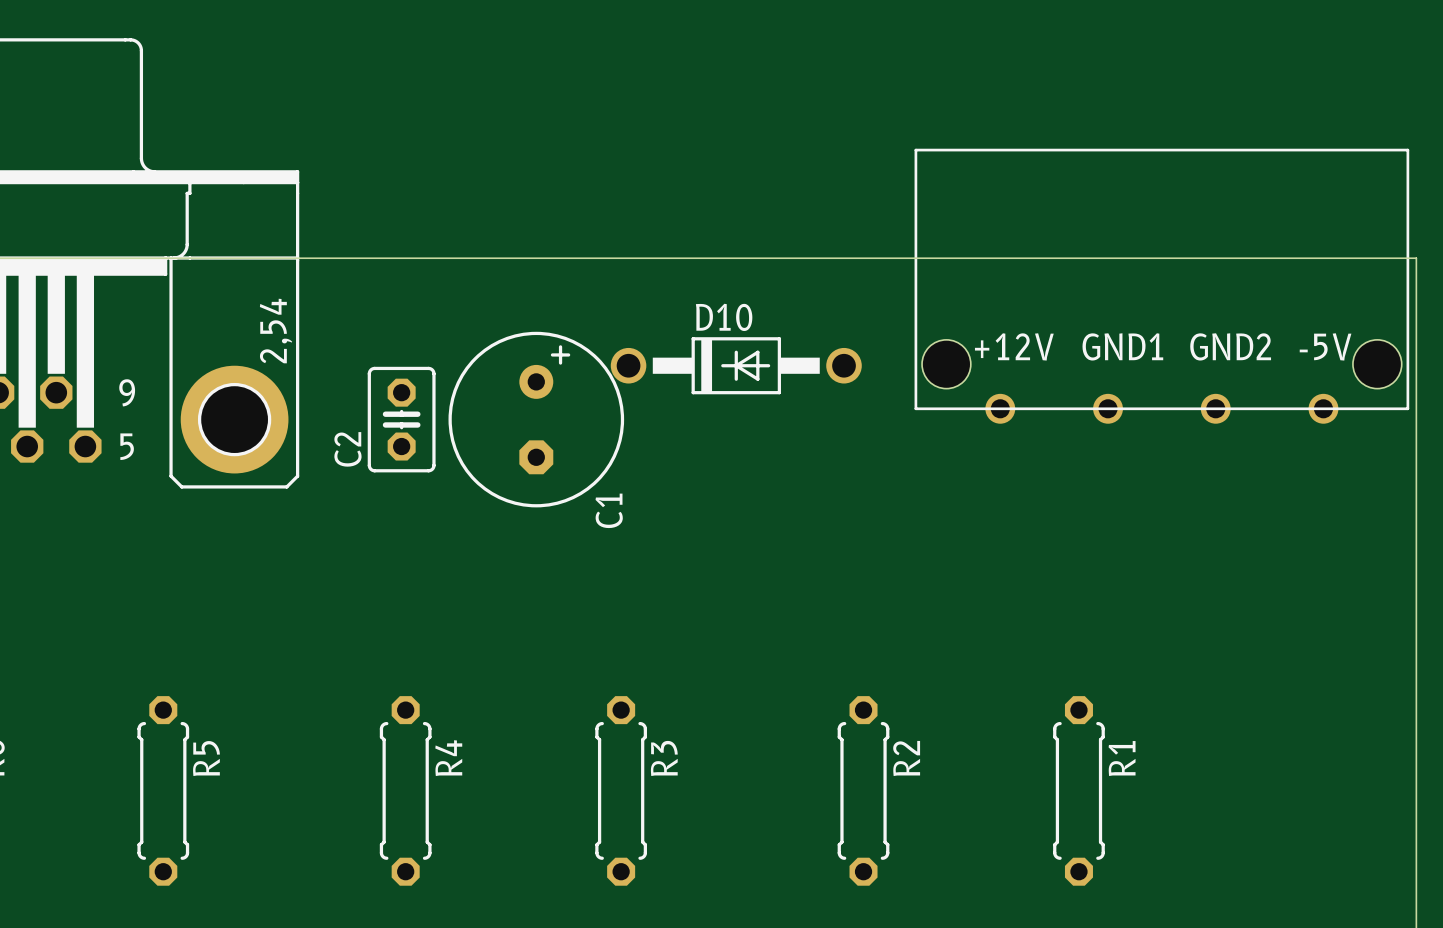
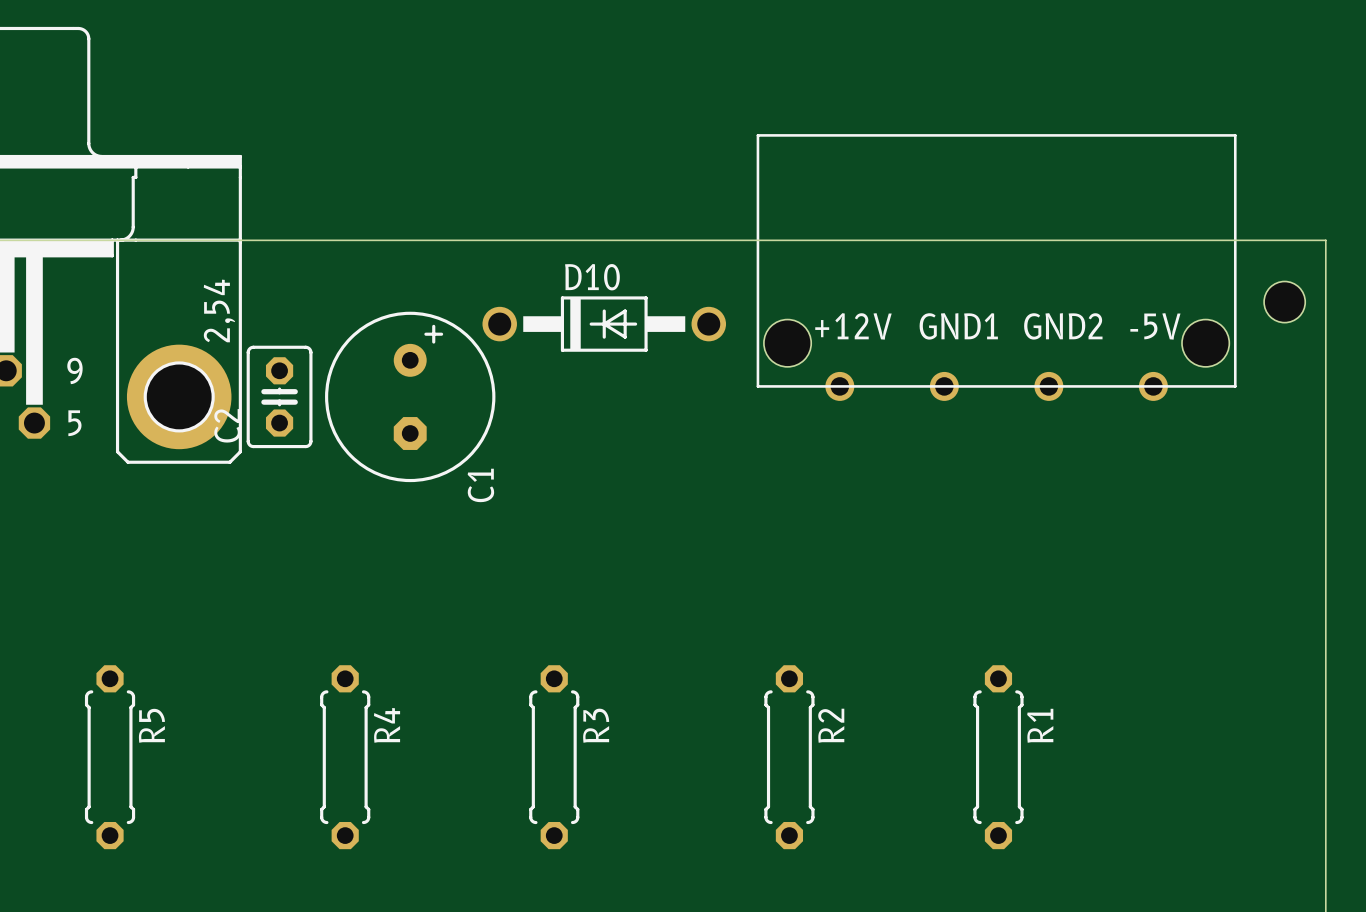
part position: (1161, 286) -> (996, 267)
hole: none -> (1284, 302)
D10 position: (736, 365) -> (604, 324)
C2 position: (401, 419) -> (279, 396)
C1 position: (536, 419) -> (410, 396)

